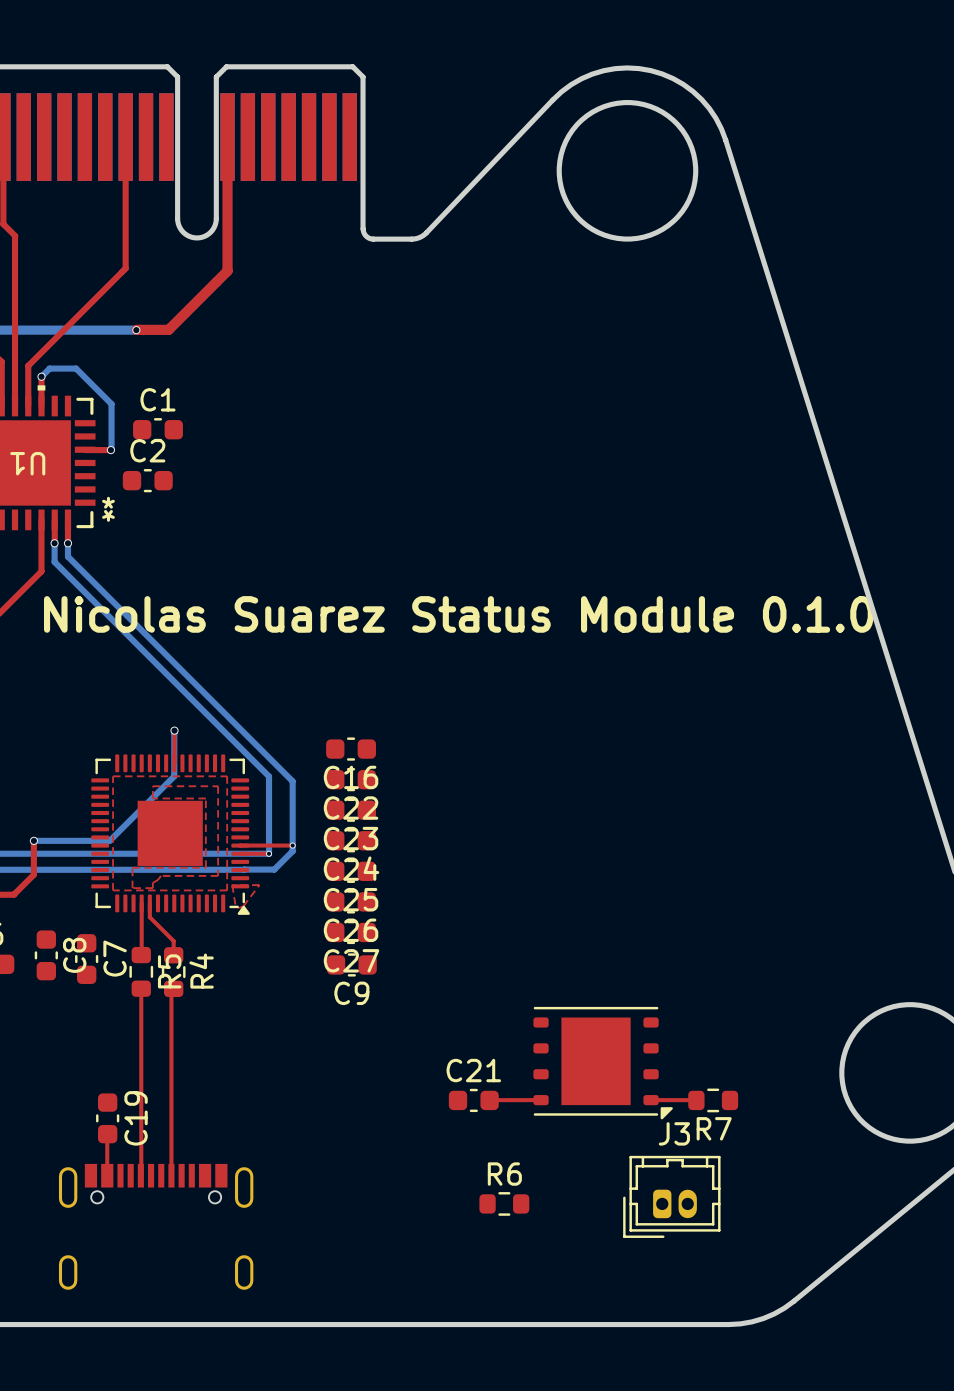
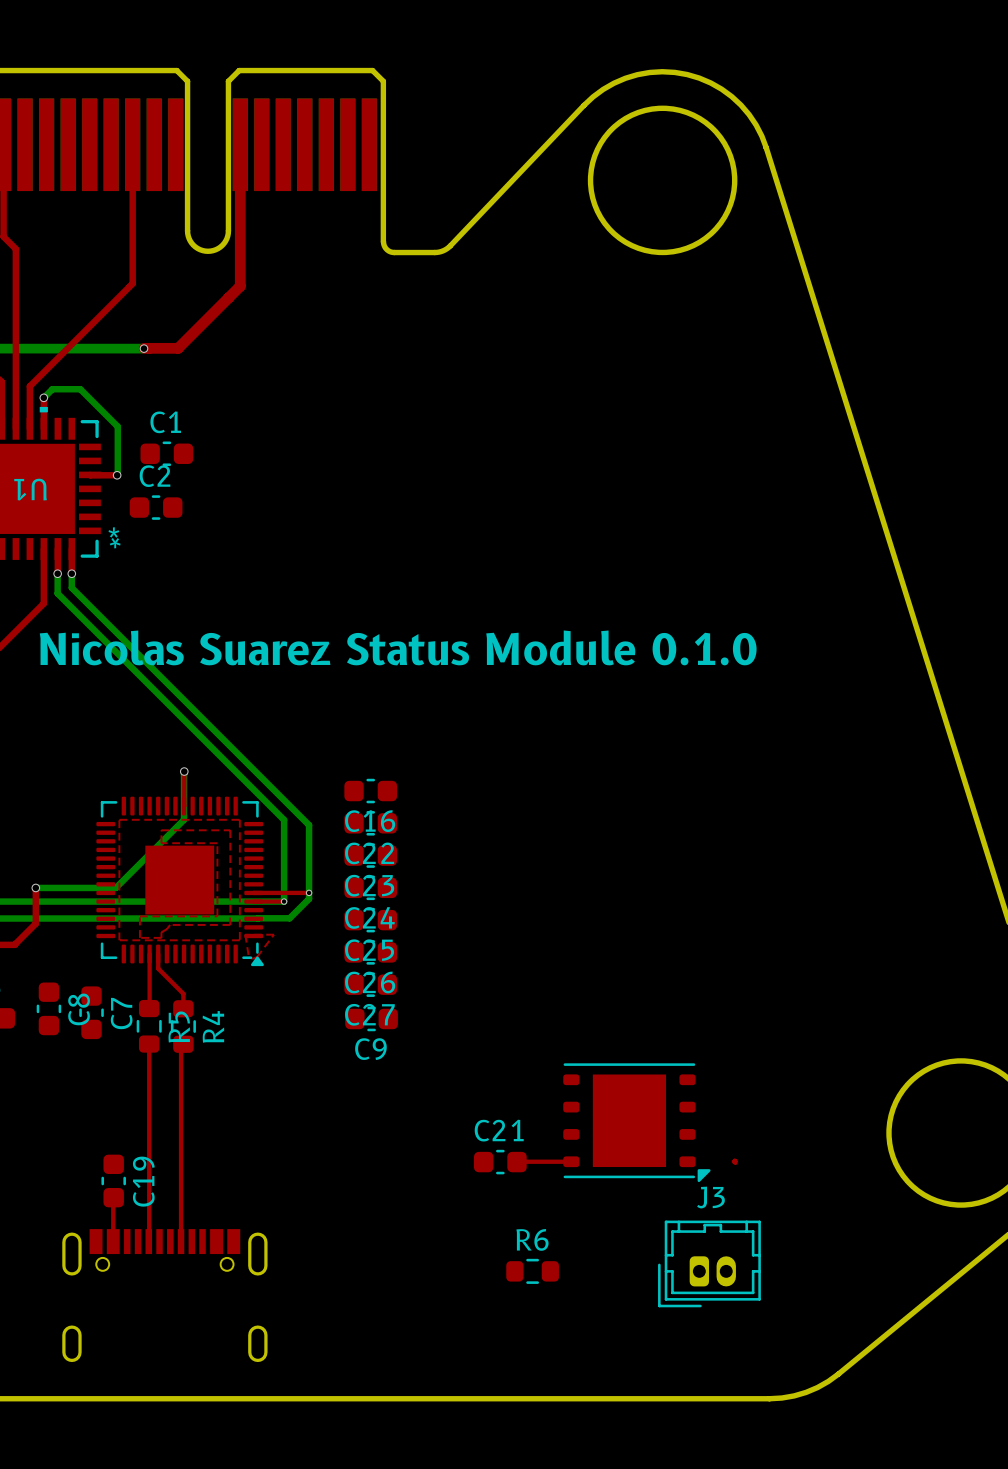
top track: (651, 1100) (694, 1100) -> none
R7: (713, 1100) -> none

